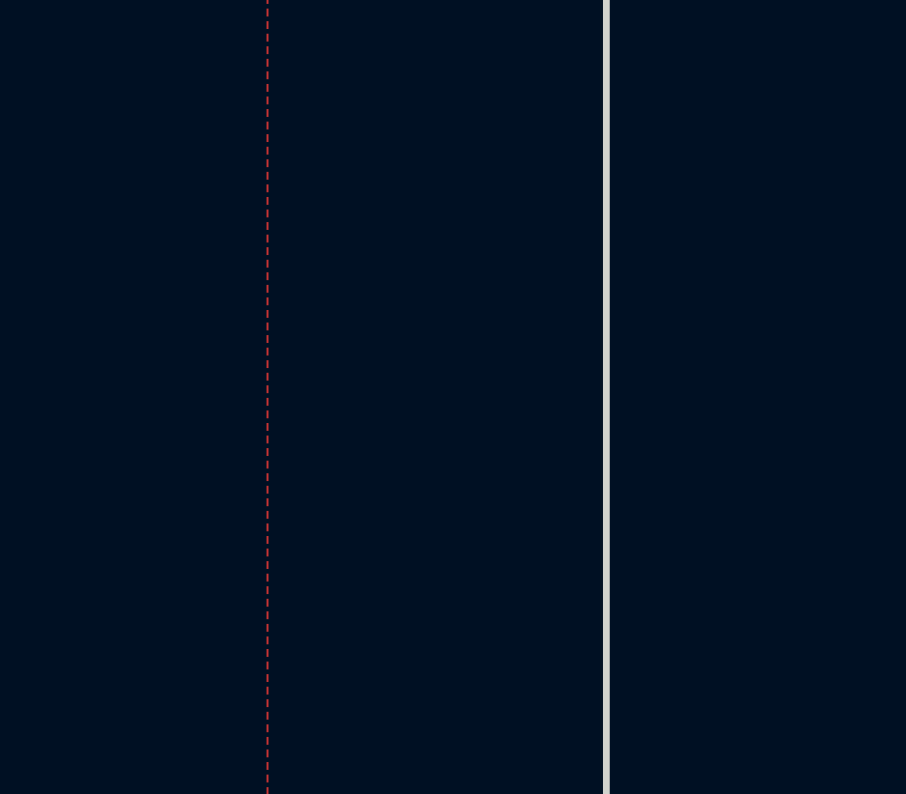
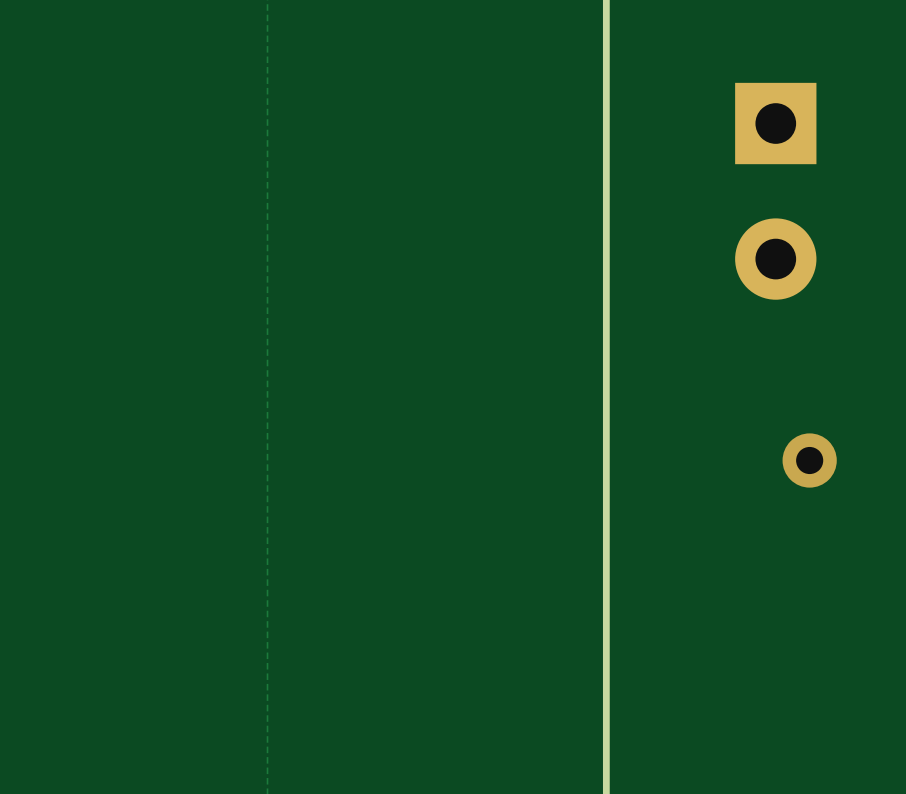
part: none -> (775, 191)
via: none -> (809, 460)

